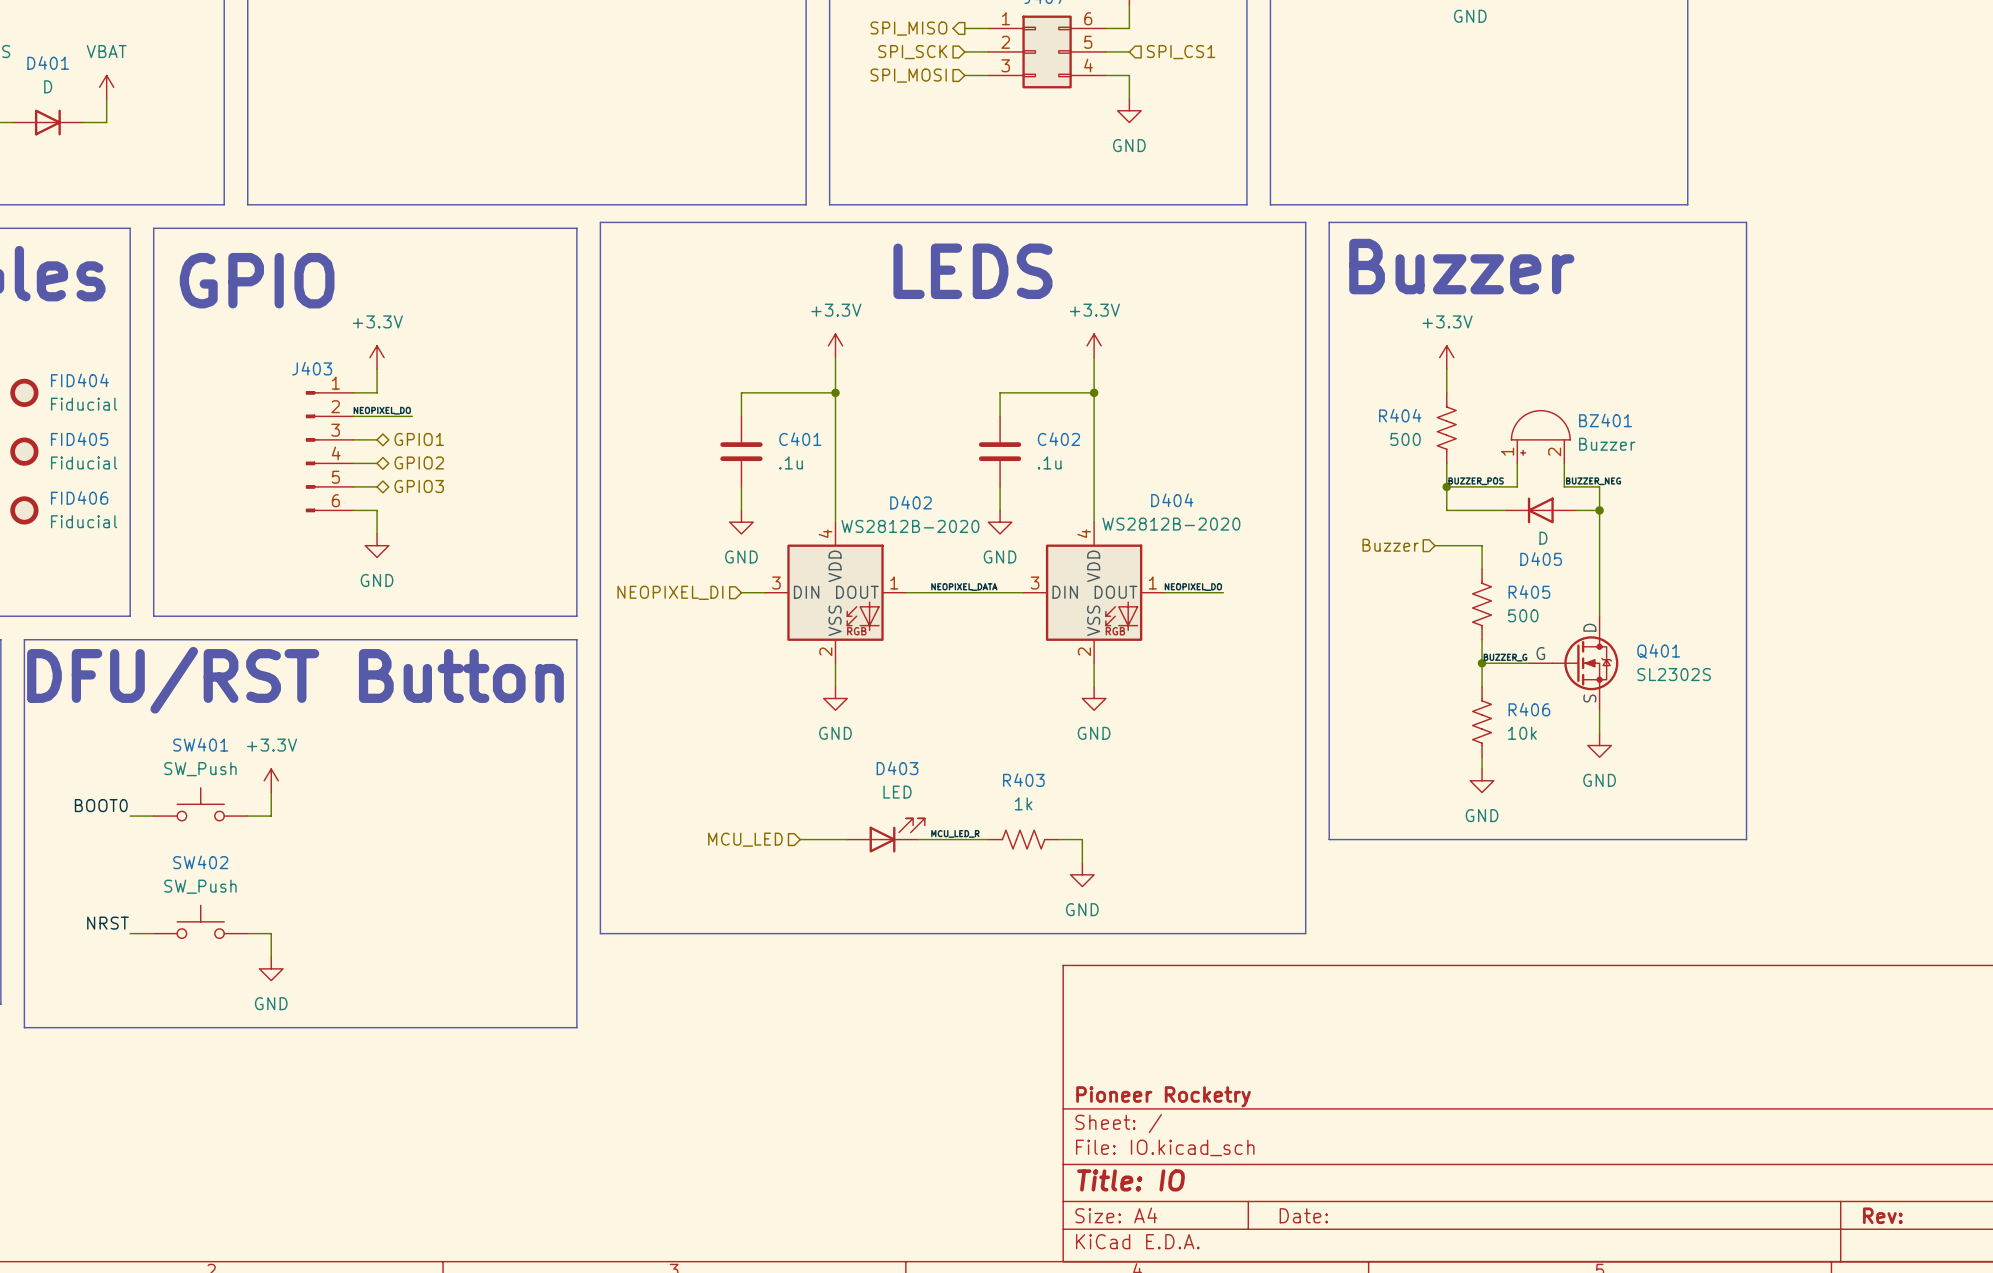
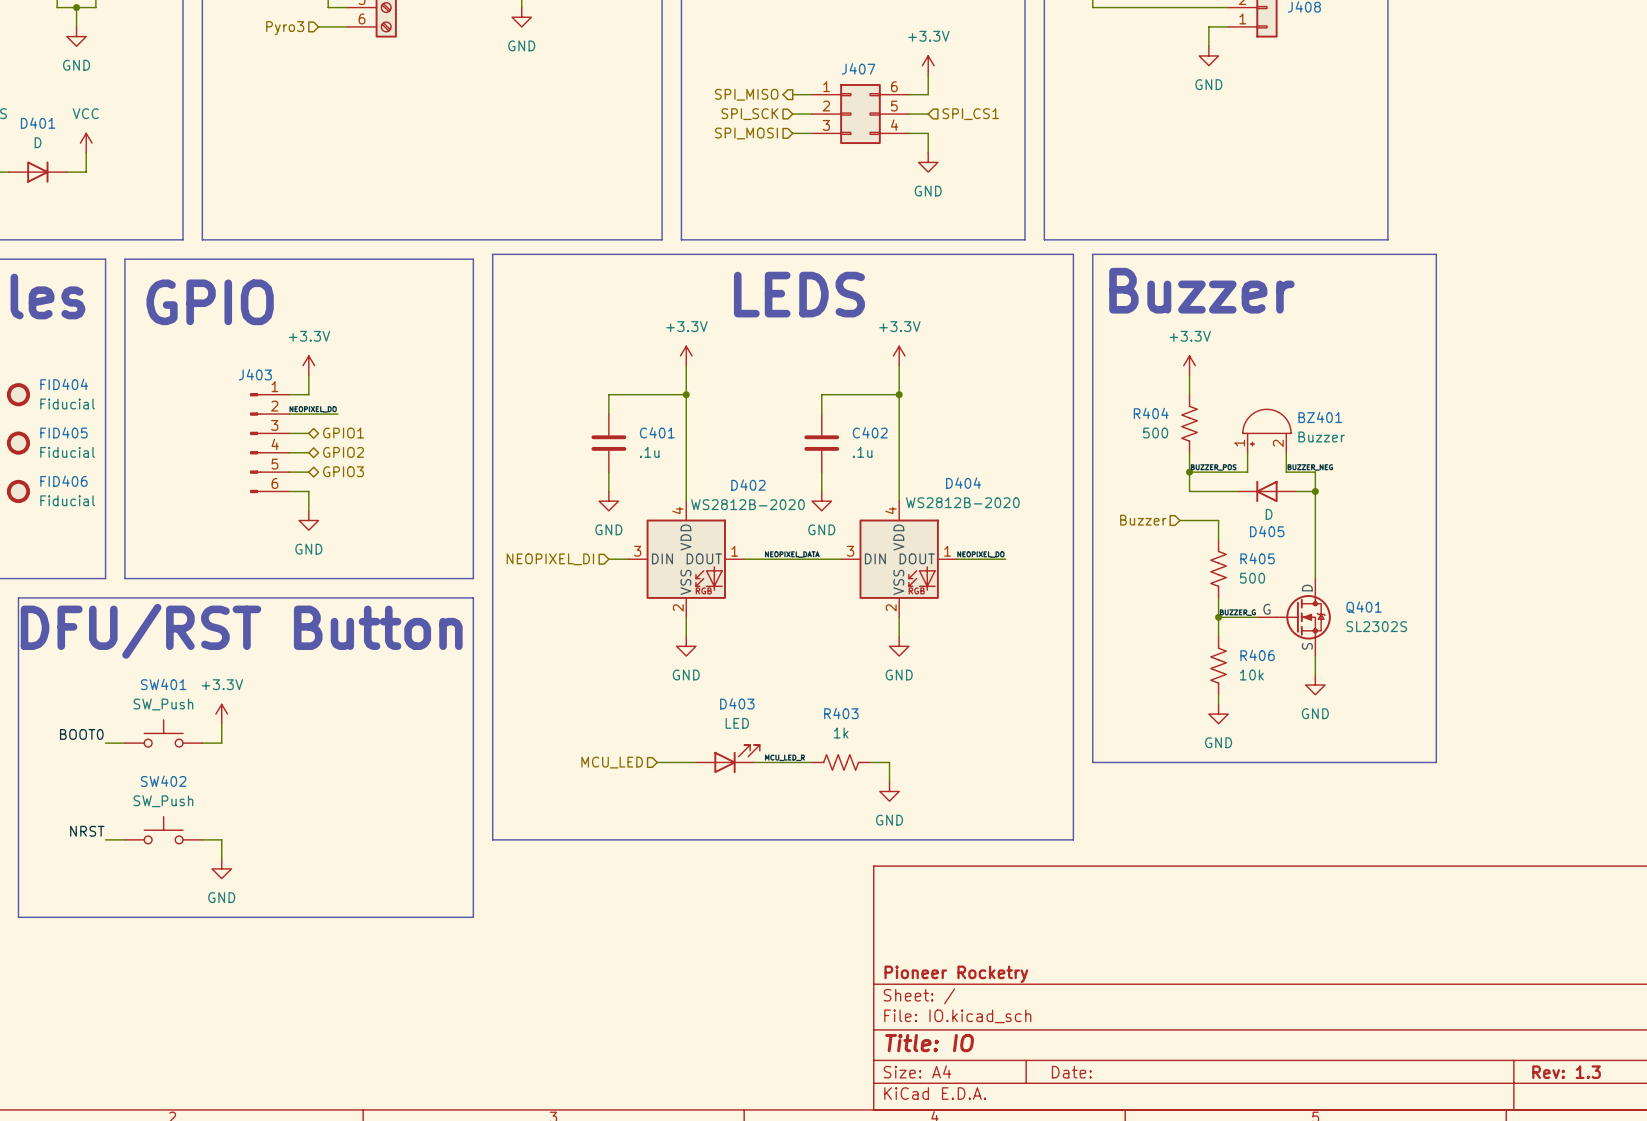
power symbol: VBAT (106, 87) -> VCC (86, 143)
title block: Rev: (1882, 1215) -> Rev: 1.3 (1566, 1072)

